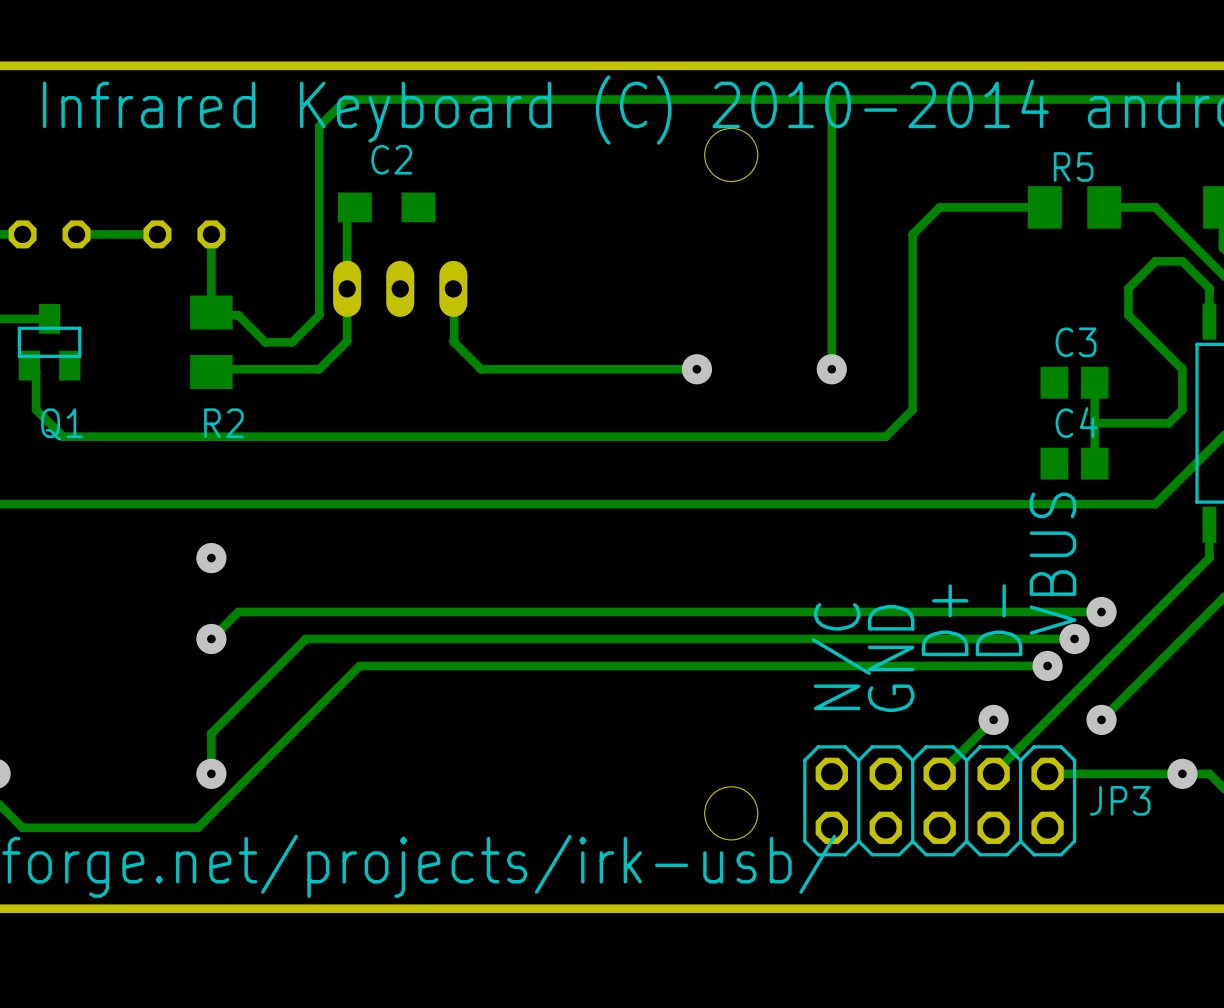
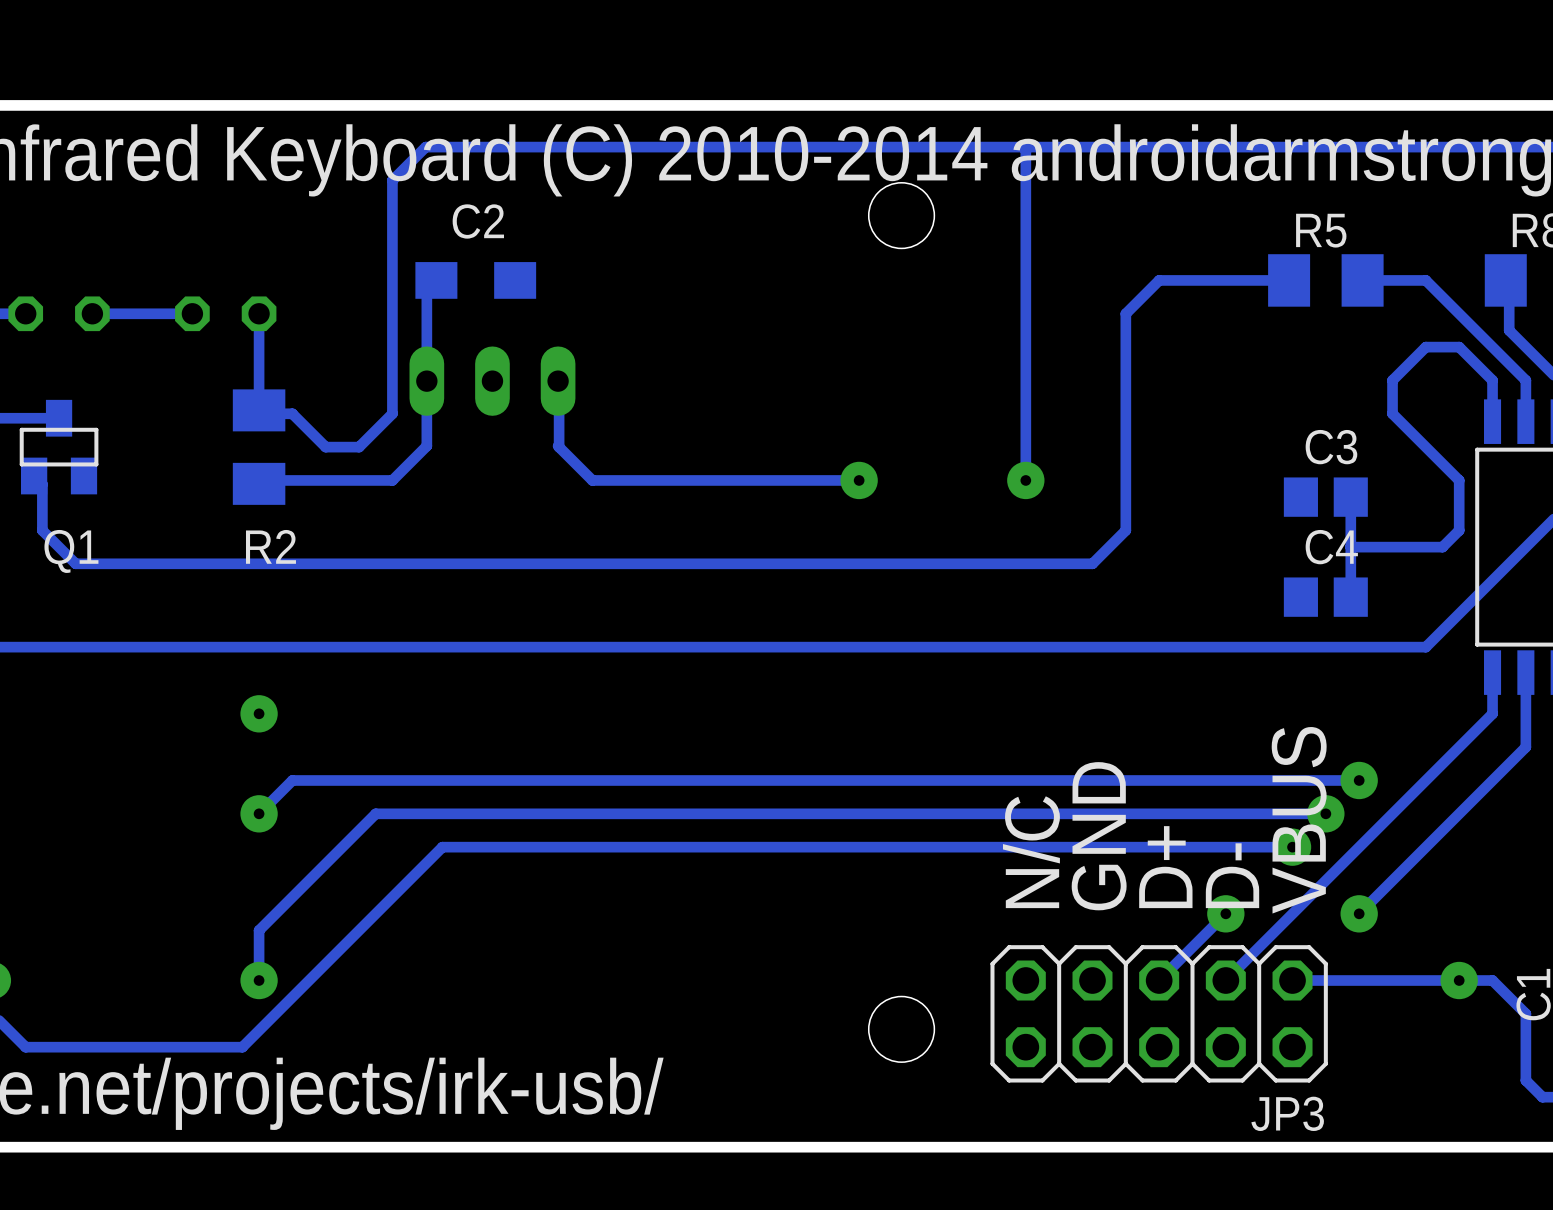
text position: VBUS (1052, 563) -> VBUS (1299, 820)
text position: D+ (945, 620) -> D+ (1165, 867)
text position: D- (999, 620) -> D- (1232, 875)
JP3 name position: JP3 (1120, 800) -> JP3 (1287, 1113)

